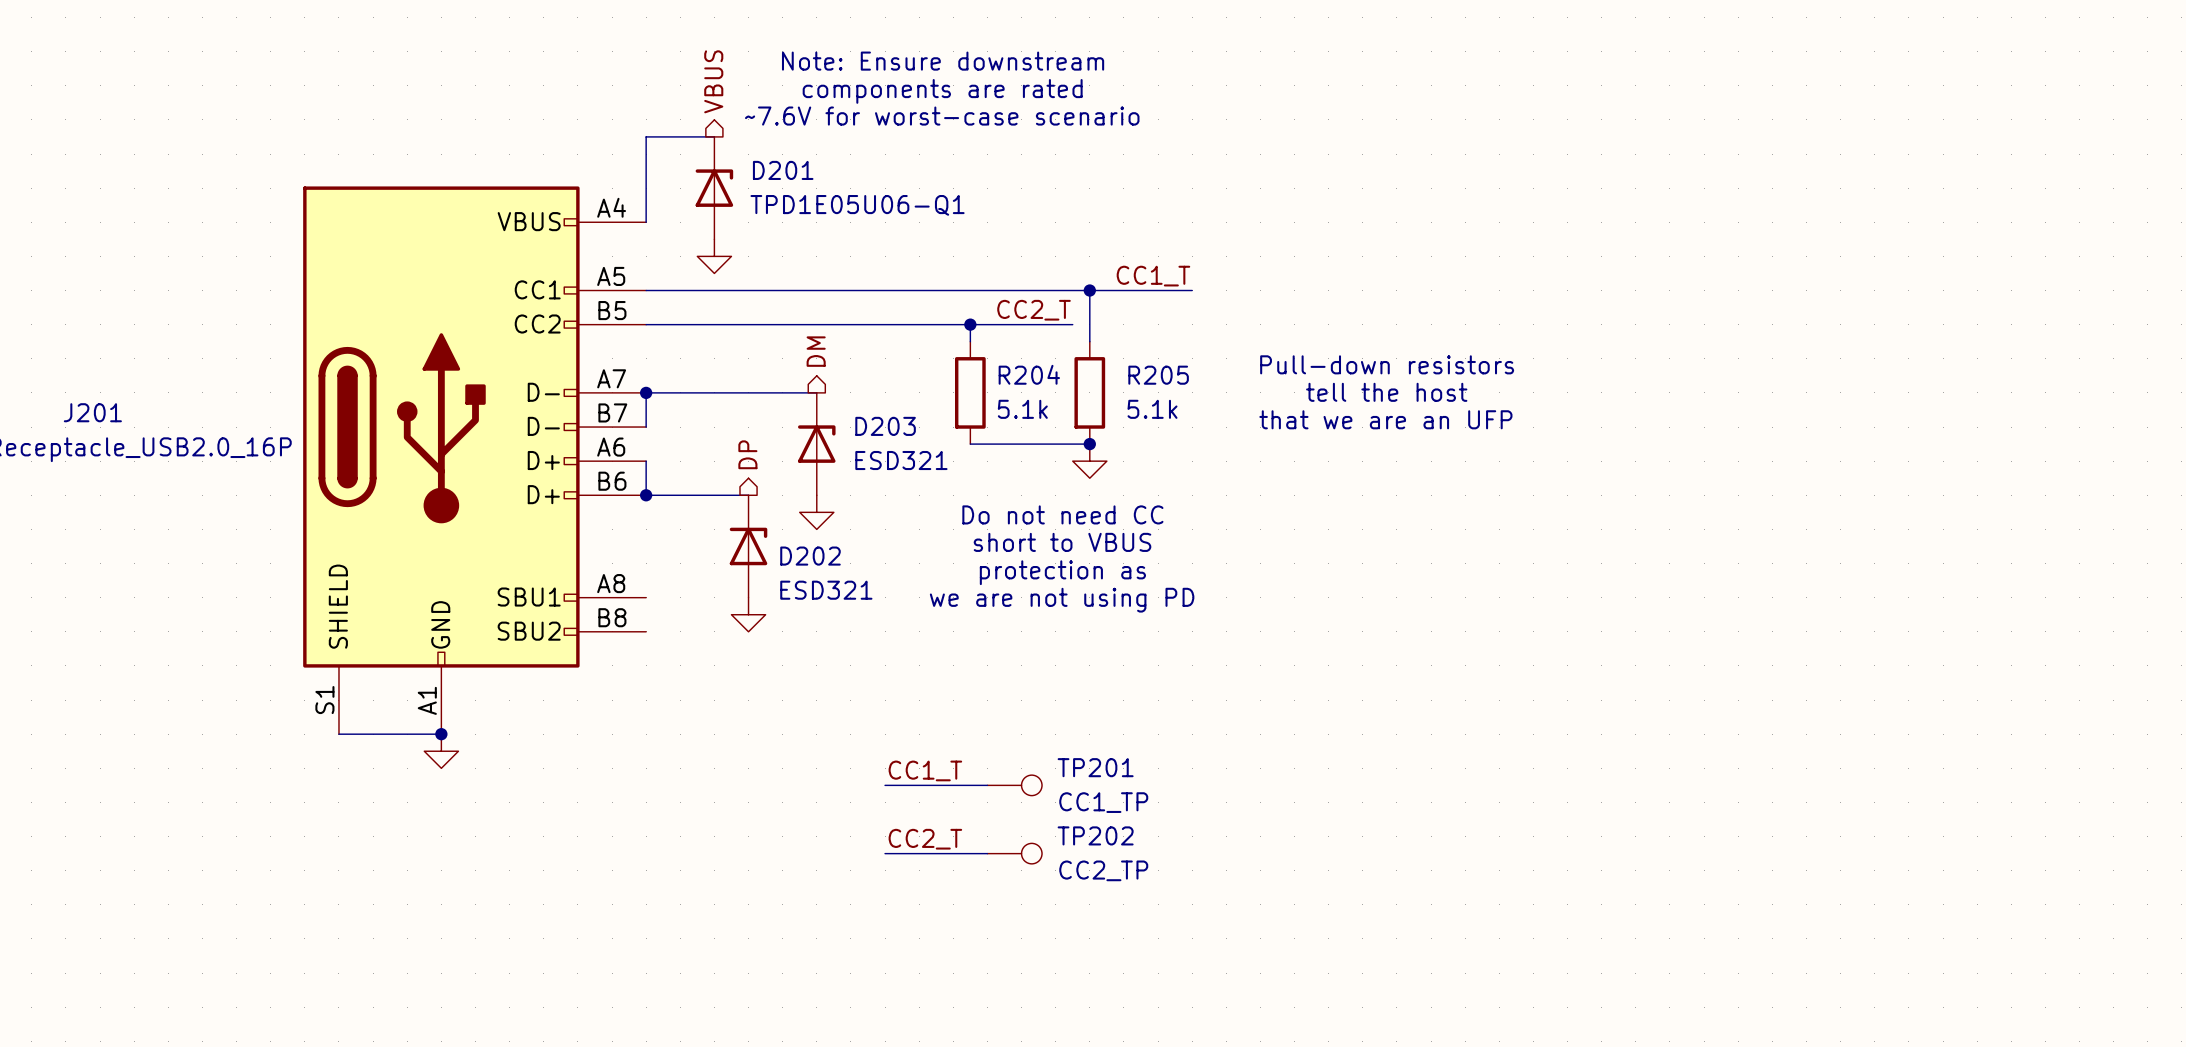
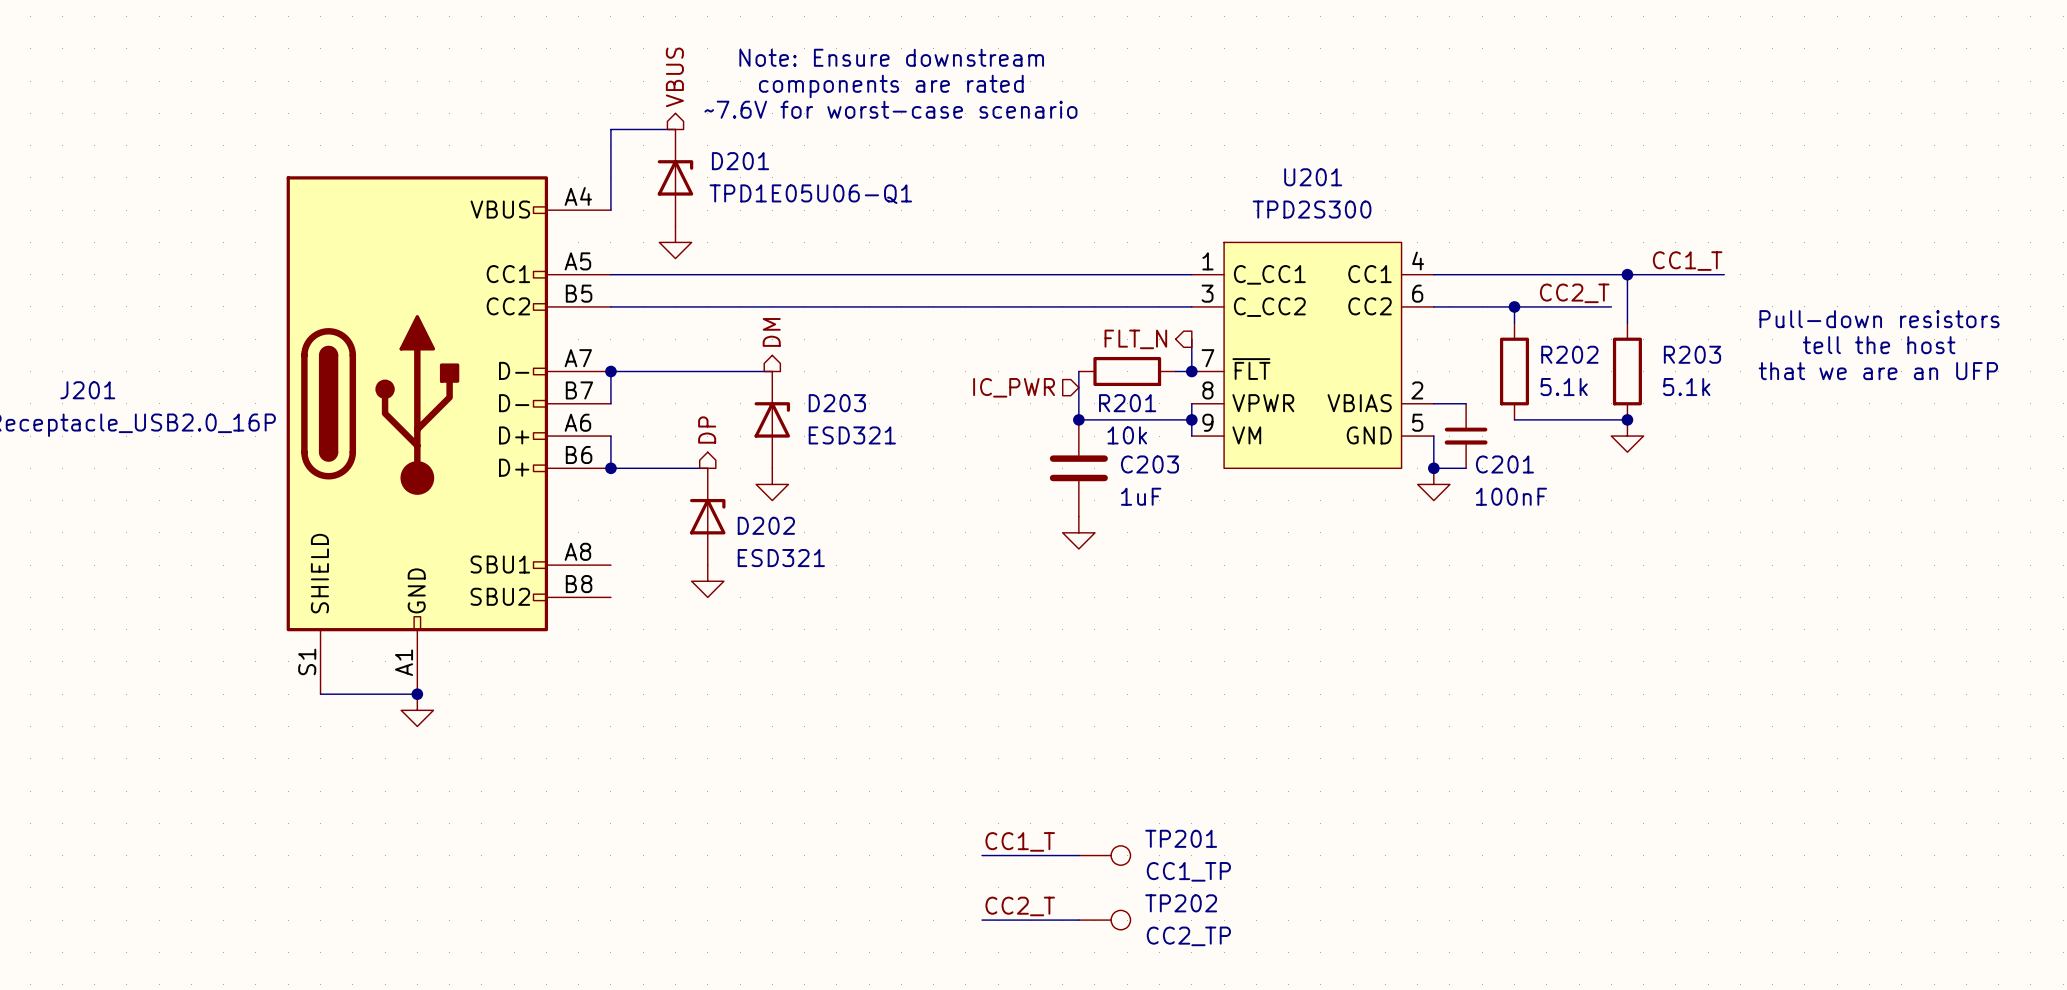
label: CC1_T (1153, 276) -> none
label: none -> CC1_T (1687, 261)
wire: (1089, 290) (1089, 341) -> none
junction: (1089, 290) -> none
wire: none -> (1127, 274) (1191, 274)
wire: none -> (1433, 274) (1724, 274)
wire: none -> (1627, 274) (1627, 323)
junction: none -> (1627, 274)
label: CC2_T (1034, 310) -> none
label: none -> CC2_T (1574, 293)
wire: (970, 324) (970, 341) -> none
junction: (970, 324) -> none
wire: none -> (1014, 306) (1191, 306)
wire: none -> (1433, 306) (1611, 306)
wire: none -> (1514, 306) (1514, 323)
junction: none -> (1514, 306)
text: none -> Pull-down resistors (1879, 319)
hierarchical label: none -> FLT_N (1135, 339)
wire: none -> (1191, 339) (1191, 371) (1175, 371)
text: Pull-down resistors (1387, 364) -> none
text: none -> tell the host (1879, 345)
U201: none -> TPD2S300 (1312, 355)
R204: 5.1k (970, 392) -> none
R205: 5.1k (1089, 392) -> none
wire: none -> (1078, 371) (1078, 419) (1191, 419)
R201: none -> 10k (1127, 371)
junction: none -> (1191, 371)
text: tell the host (1386, 392) -> none
R202: none -> 5.1k (1514, 371)
R203: none -> 5.1k (1627, 371)
text: none -> that we are an UFP (1878, 371)
hierarchical label: none -> IC_PWR (1014, 387)
text: that we are an UFP (1385, 419) -> none
wire: none -> (1191, 403) (1191, 436)
wire: none -> (1433, 403) (1466, 403)
wire: (970, 444) (1089, 444) -> none
junction position: (1089, 444) -> (1078, 419)
junction: none -> (1191, 419)
wire: none -> (1514, 419) (1627, 419)
junction: none -> (1627, 419)
power symbol position: (1089, 461) -> (1078, 532)
wire: none -> (1433, 436) (1433, 468) (1466, 468)
C201: none -> 100nF (1466, 436)
power symbol: none -> (1627, 436)
C203: none -> 1uF (1078, 468)
junction: none -> (1433, 468)
power symbol: none -> (1433, 484)
text: Do not need CC (1062, 514) -> none
text: short to VBUS (1062, 542) -> none
text: protection as (1062, 572) -> none
text: we are not using PD (1062, 600) -> none
label position: CC1_T (925, 770) -> CC1_T (1020, 841)
wire: (885, 785) (987, 785) -> (982, 855) (1078, 855)
TP201 position: (1014, 785) -> (1104, 855)
label position: CC2_T (925, 839) -> CC2_T (1020, 906)
wire: (885, 853) (987, 853) -> (982, 920) (1078, 920)
TP202 position: (1014, 853) -> (1104, 920)

